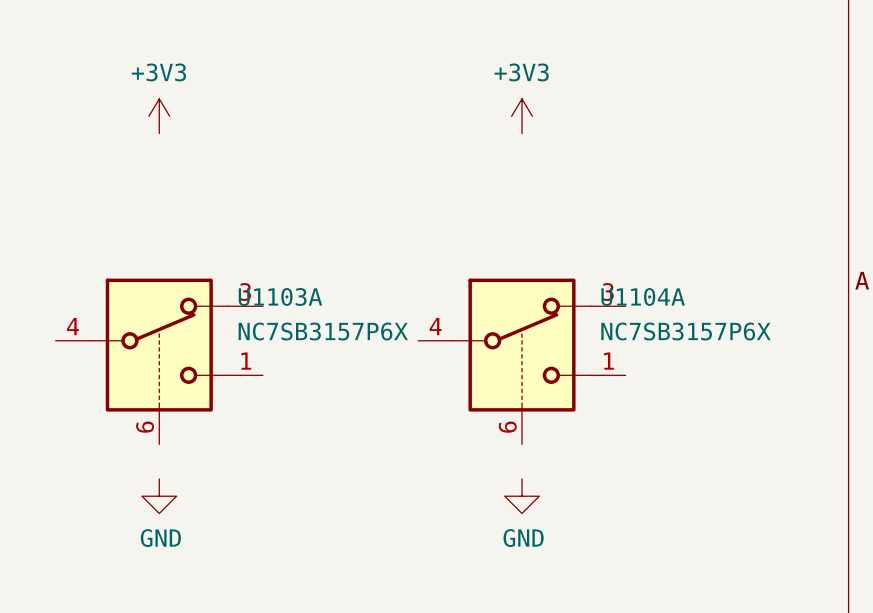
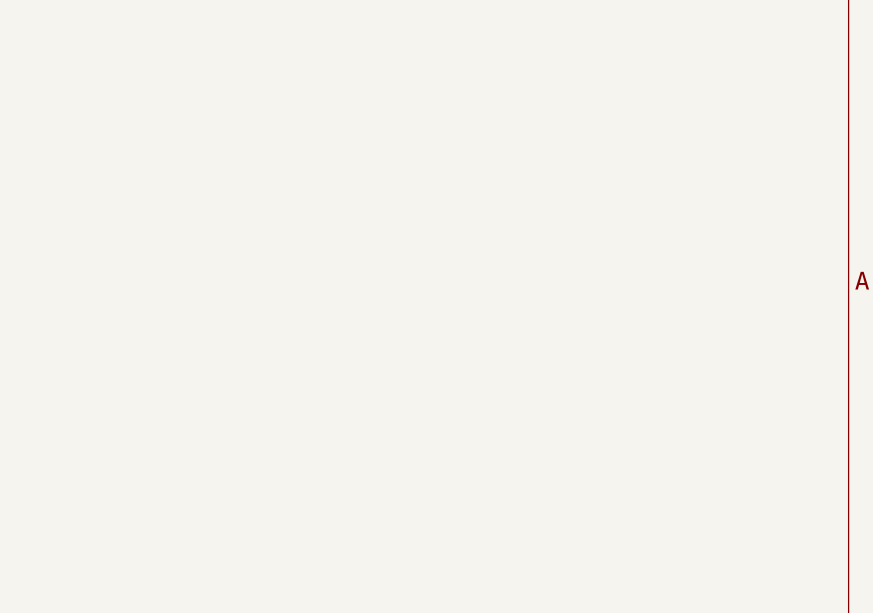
power symbol: +3V3 (159, 116) -> none
power symbol: +3V3 (522, 116) -> none
U1103A: NC7SB3157P6X (159, 361) -> none
U1104A: NC7SB3157P6X (522, 361) -> none
power symbol: GND (159, 496) -> none
power symbol: GND (522, 496) -> none

